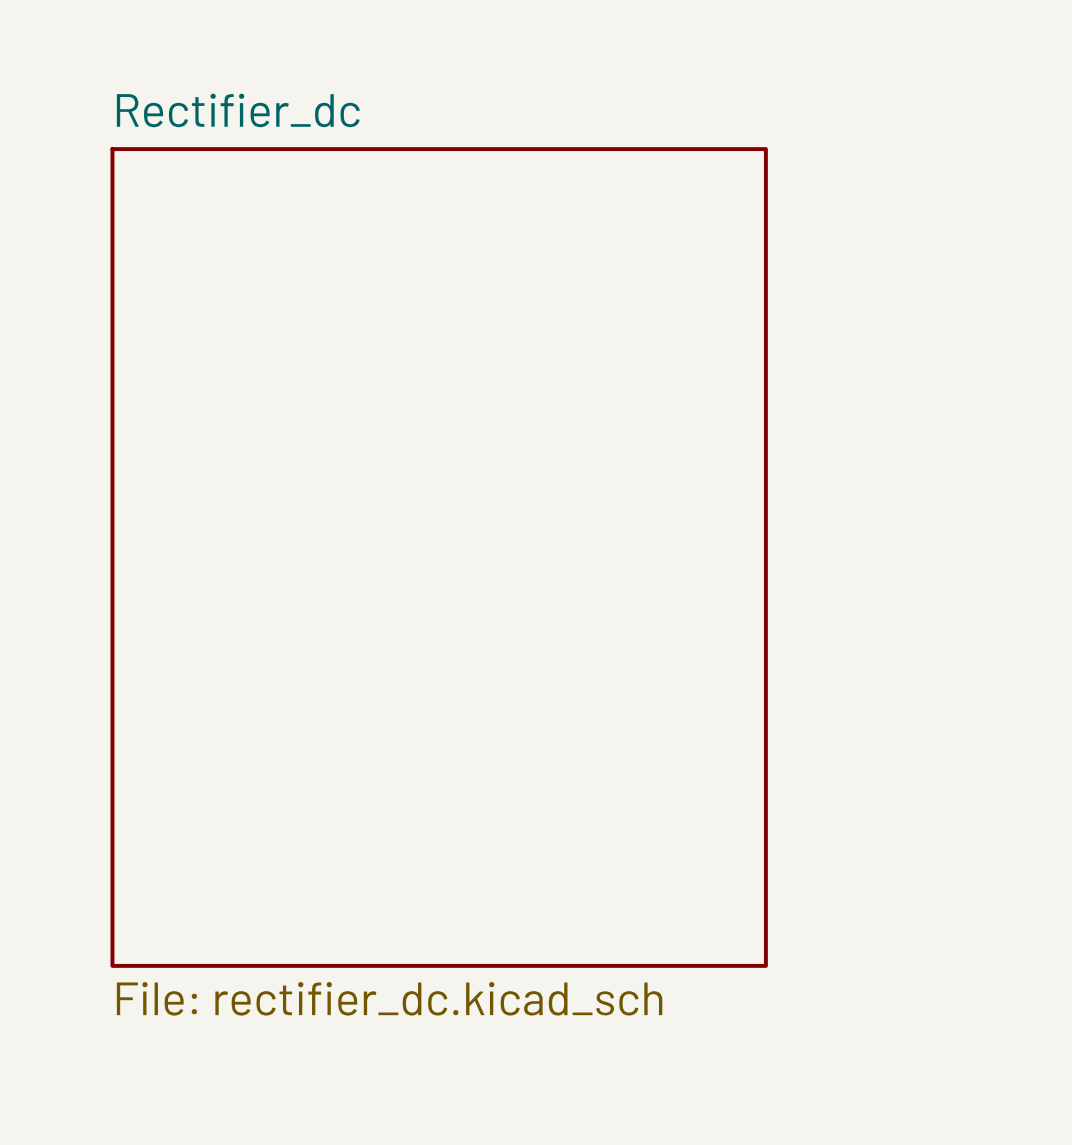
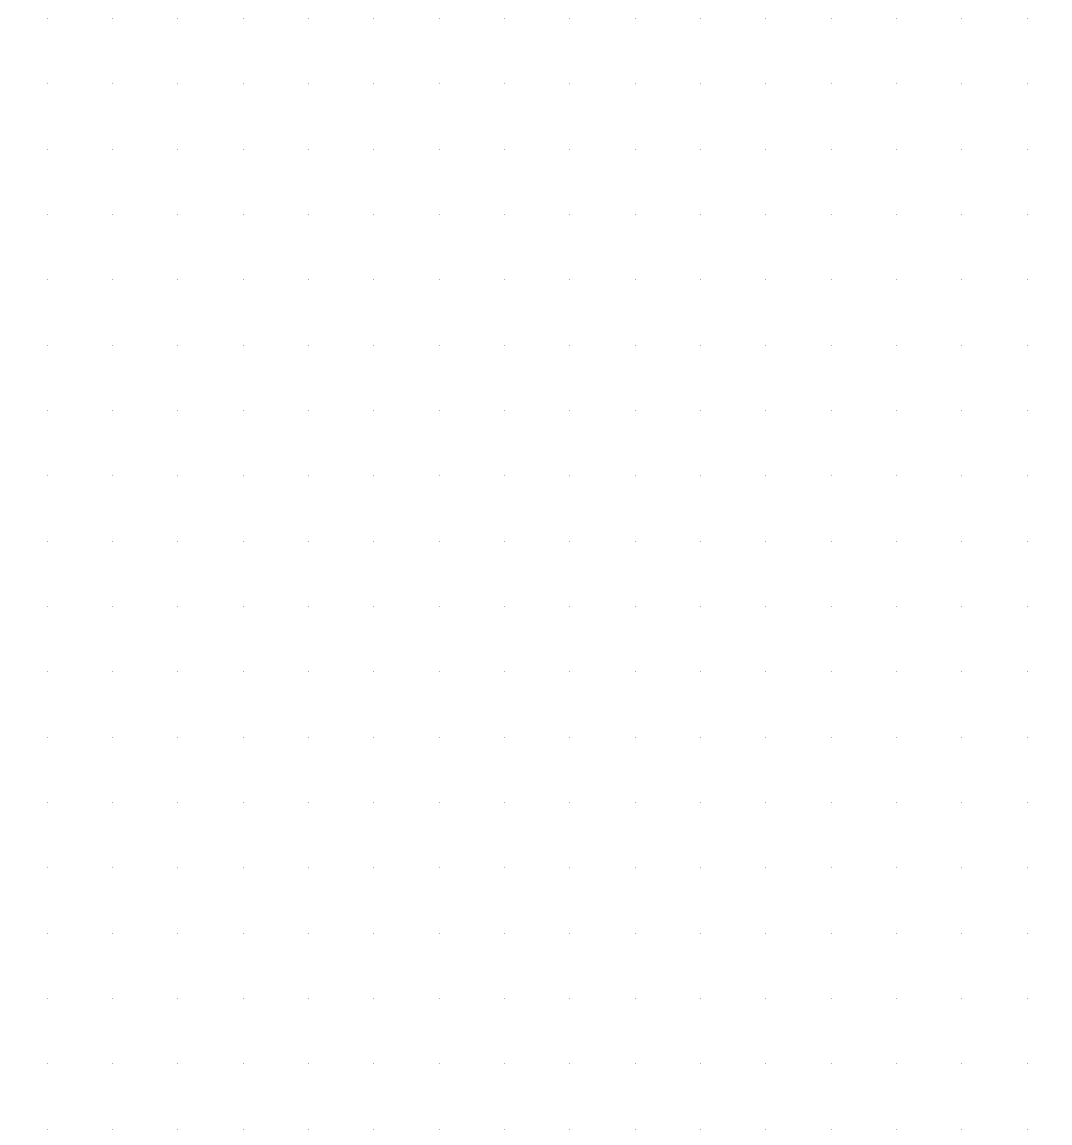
sheet Rectifier_dc: File: rectifier_dc.kicad_sch (439, 557) -> none

